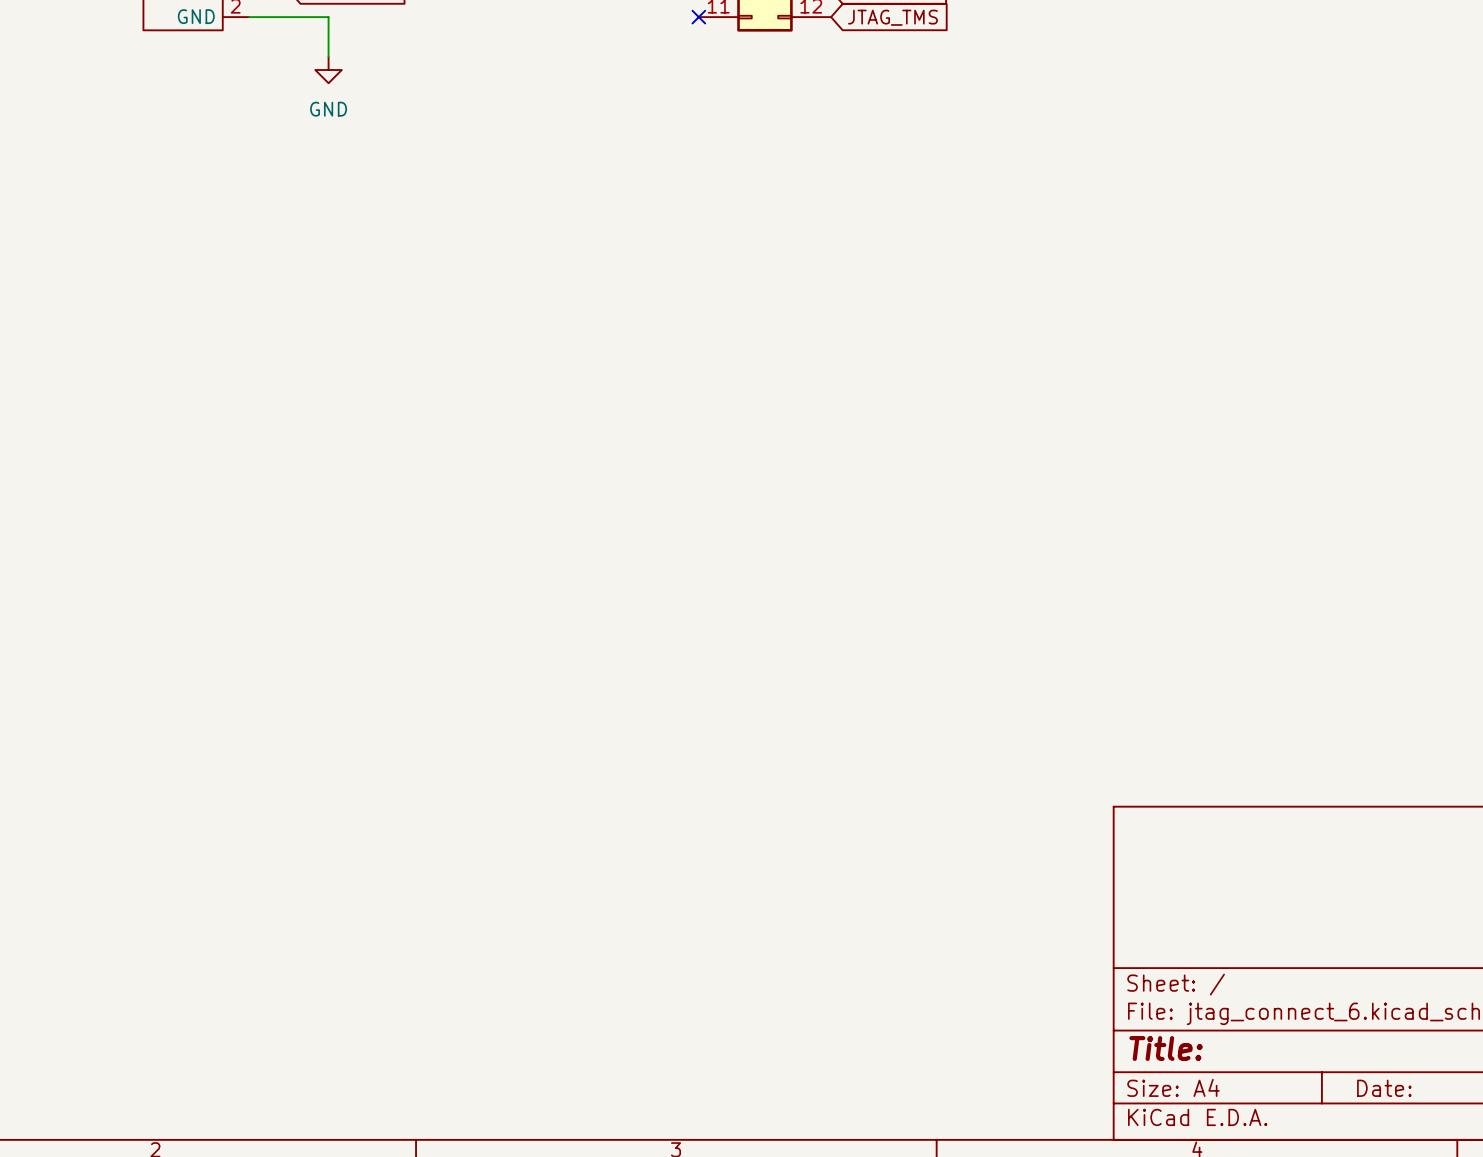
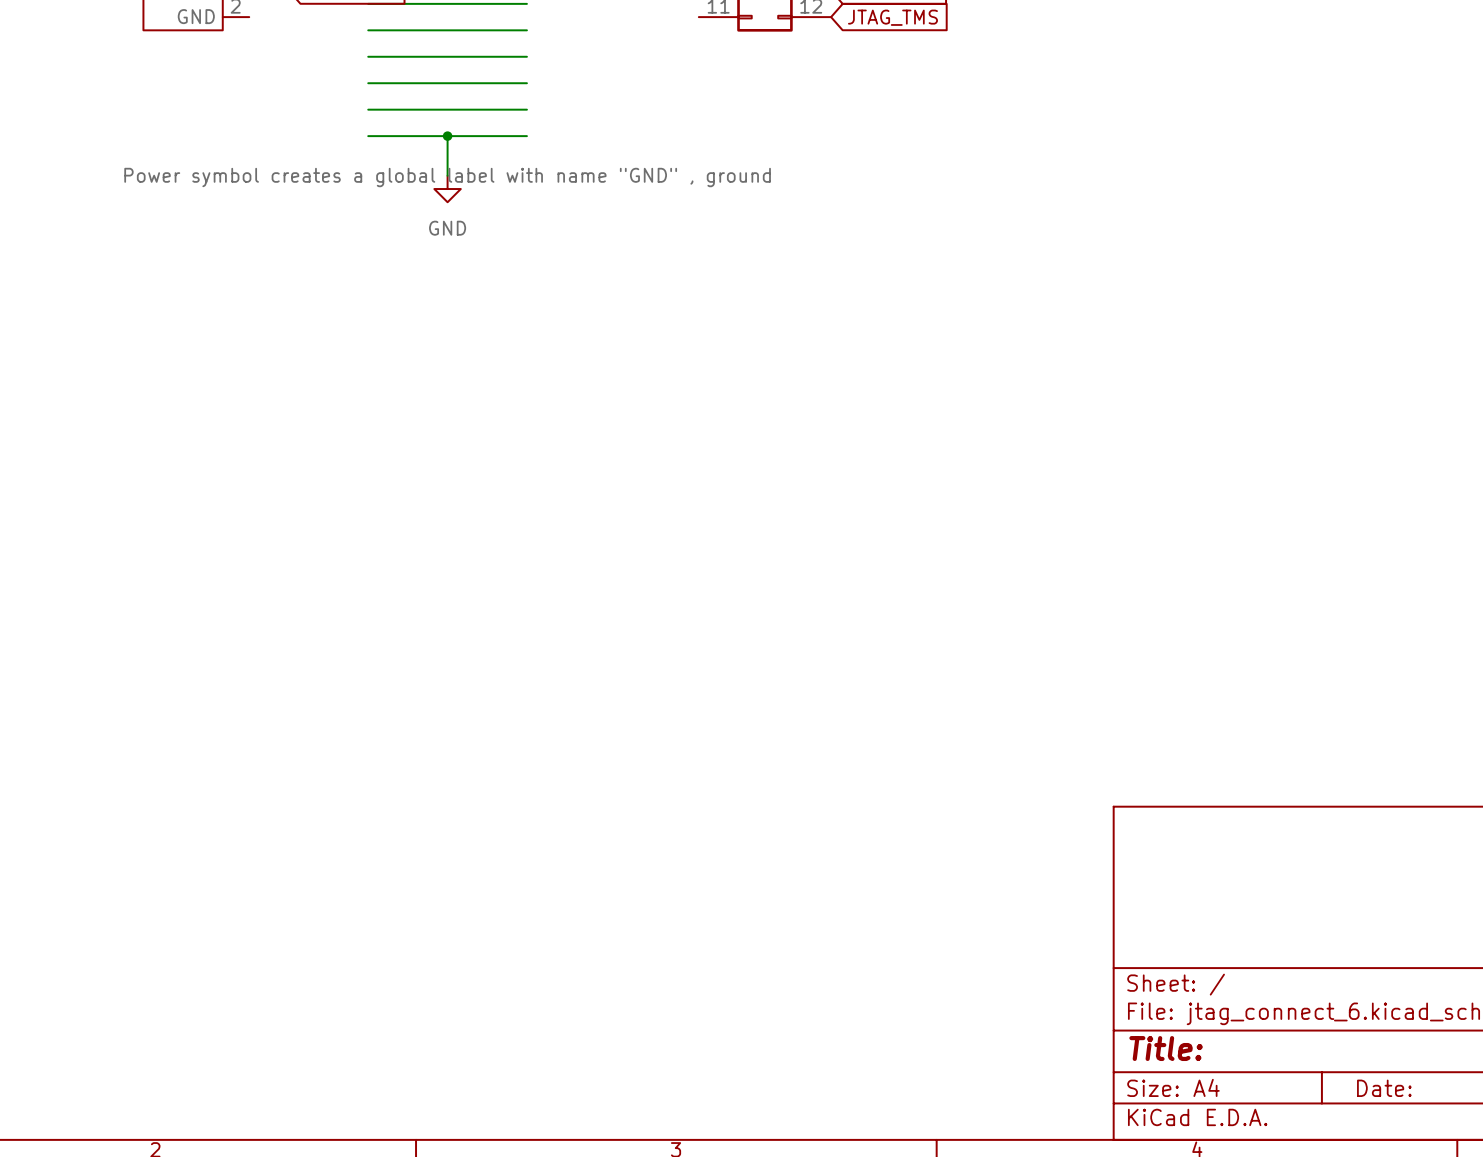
wire: none -> (368, 3) (526, 3)
wire: (249, 17) (328, 17) (328, 56) -> none
no-connect mark: (698, 17) -> none
wire: none -> (368, 30) (526, 30)
wire: none -> (368, 56) (526, 56)
power symbol: GND (328, 70) -> none
wire: none -> (368, 83) (526, 83)
wire: none -> (368, 109) (526, 109)
wire: none -> (368, 136) (526, 136)
wire: none -> (447, 136) (447, 175)
junction: none -> (447, 136)
power symbol: none -> GND (447, 189)

